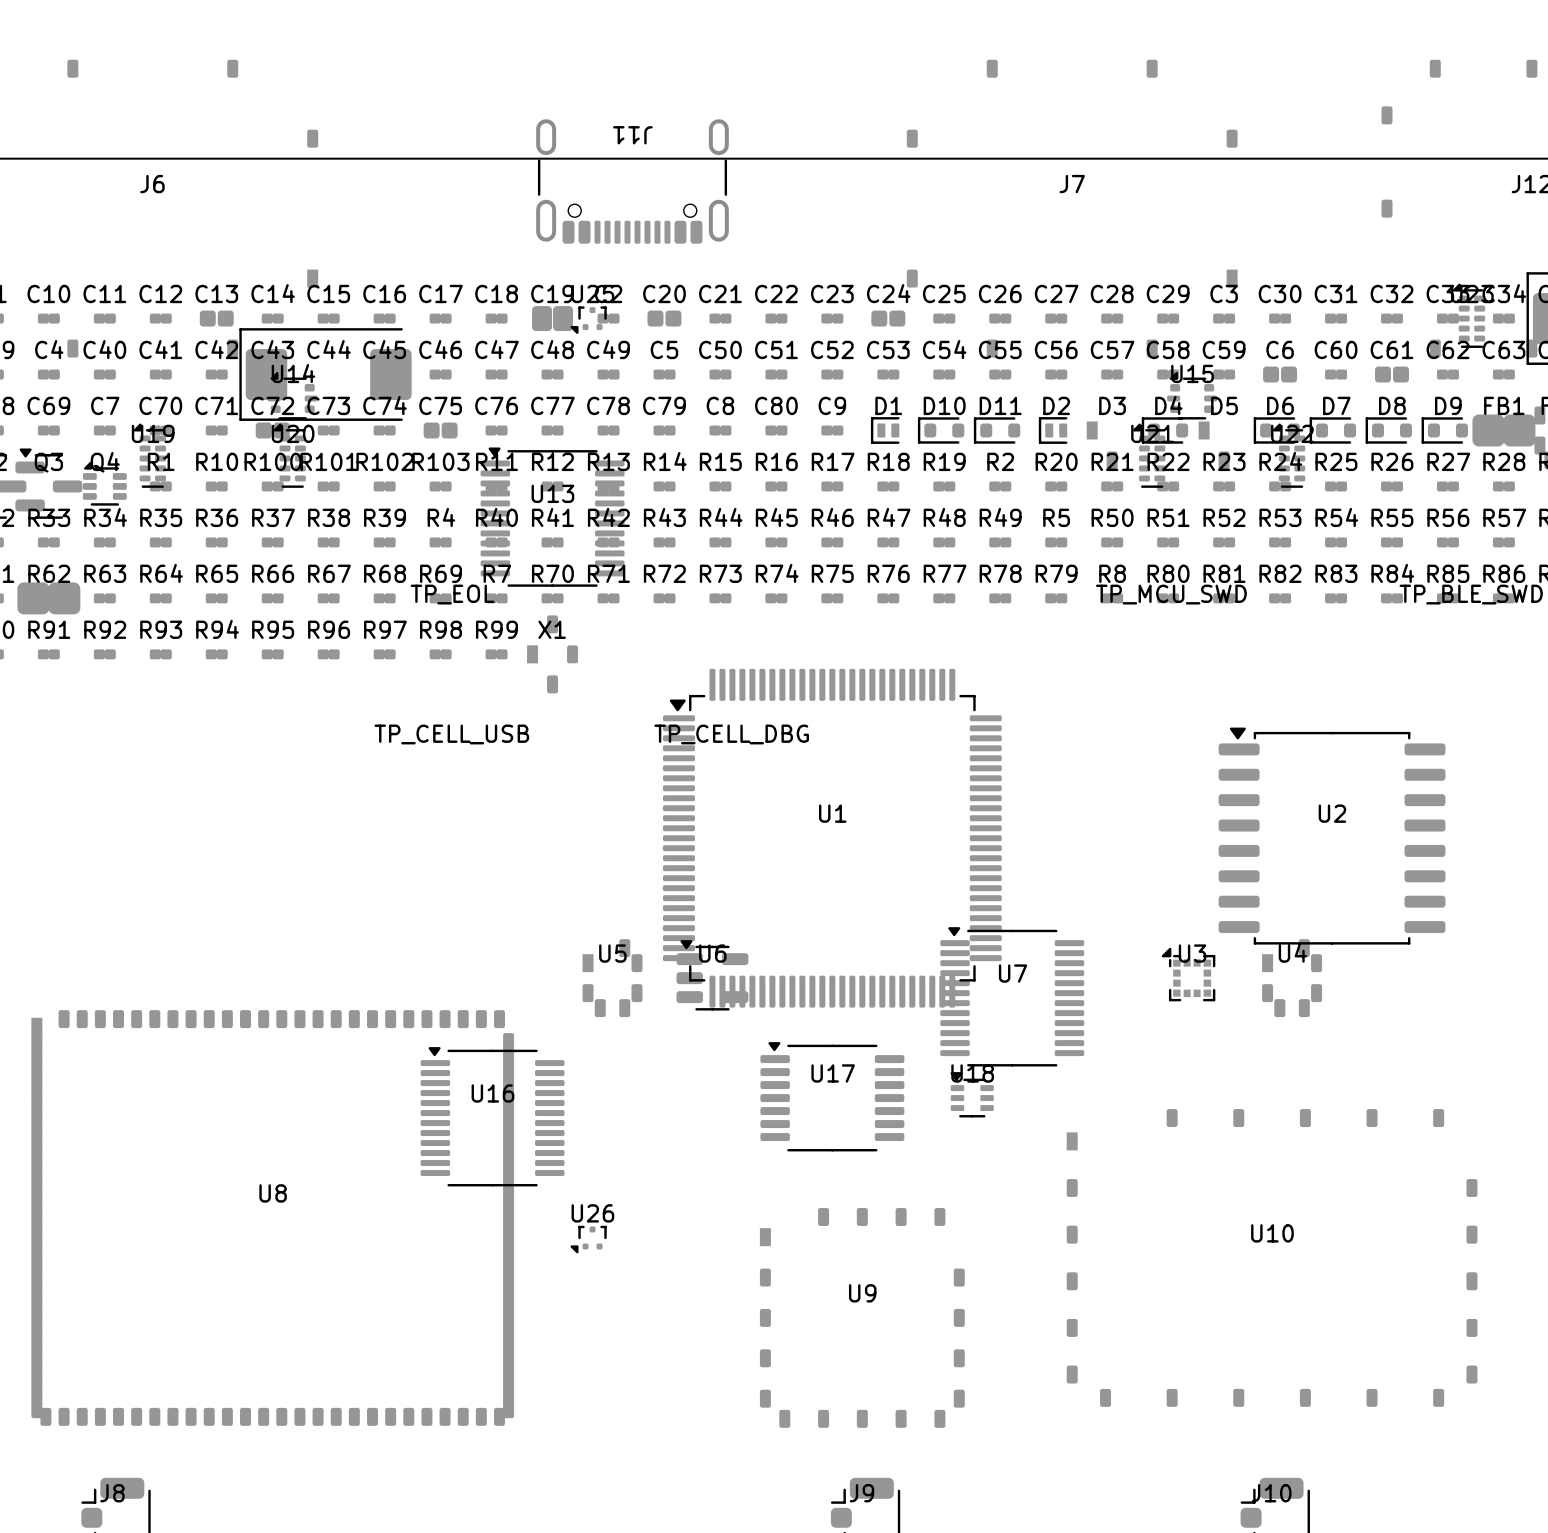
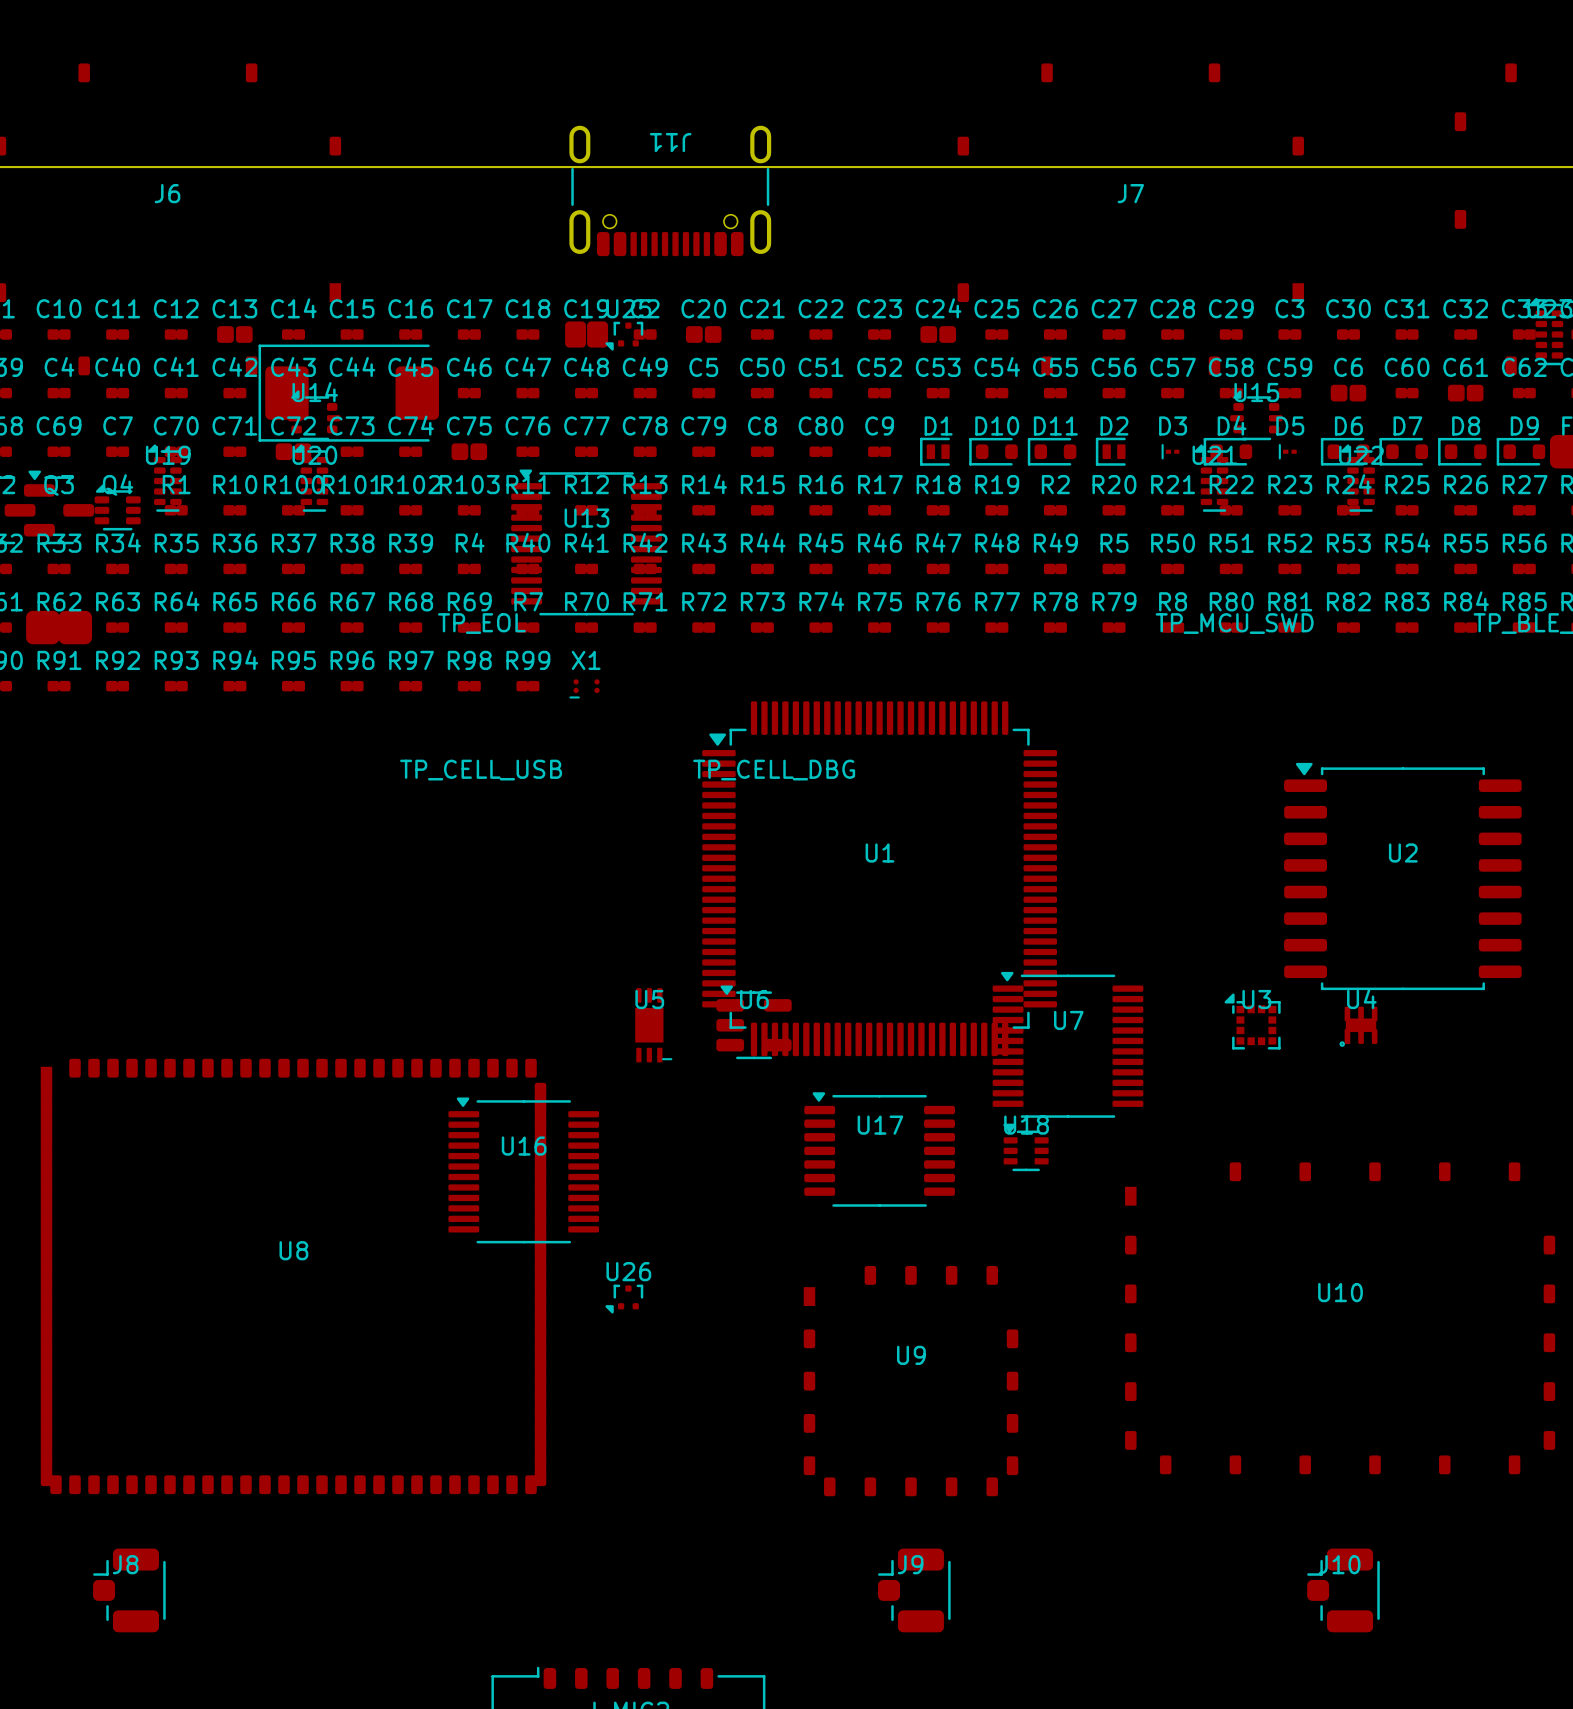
D3 footprint: [1086, 421, 1118, 470] -> [1161, 443, 1180, 460]
D5 footprint: [1198, 421, 1230, 470] -> [1278, 443, 1297, 460]
X1 footprint: [527, 615, 579, 694] -> [569, 679, 600, 699]
U5 footprint: [582, 939, 643, 1018] -> [635, 988, 673, 1063]
U4 footprint: [1262, 939, 1323, 1018] -> [1339, 1006, 1378, 1047]

